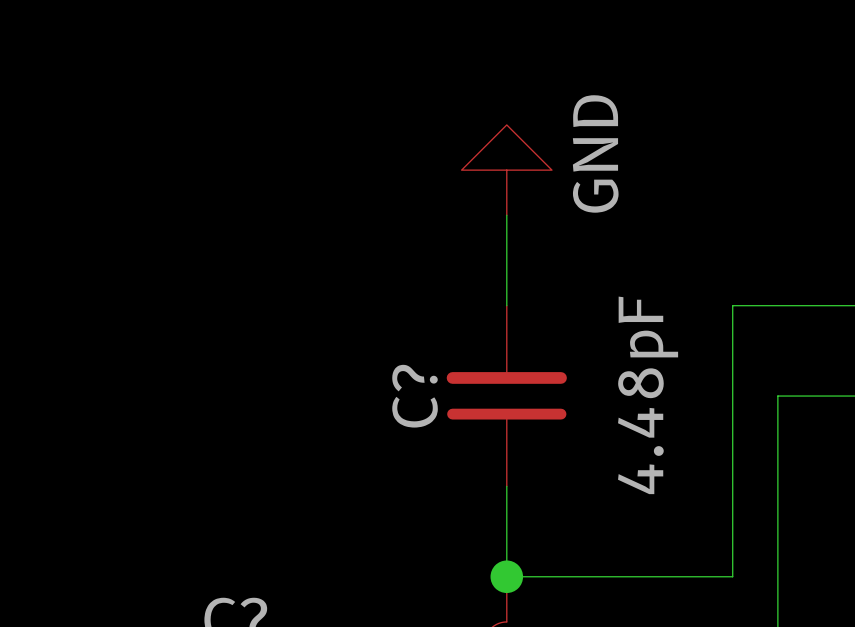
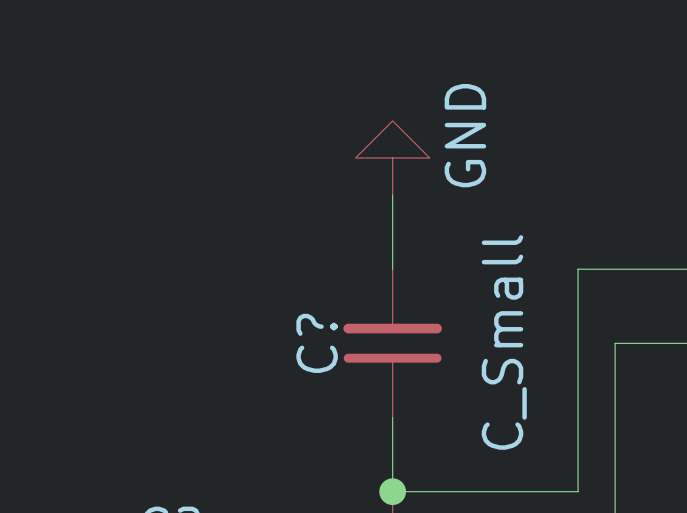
C? value: 4.48pF (648, 395) -> C_Small (504, 342)

